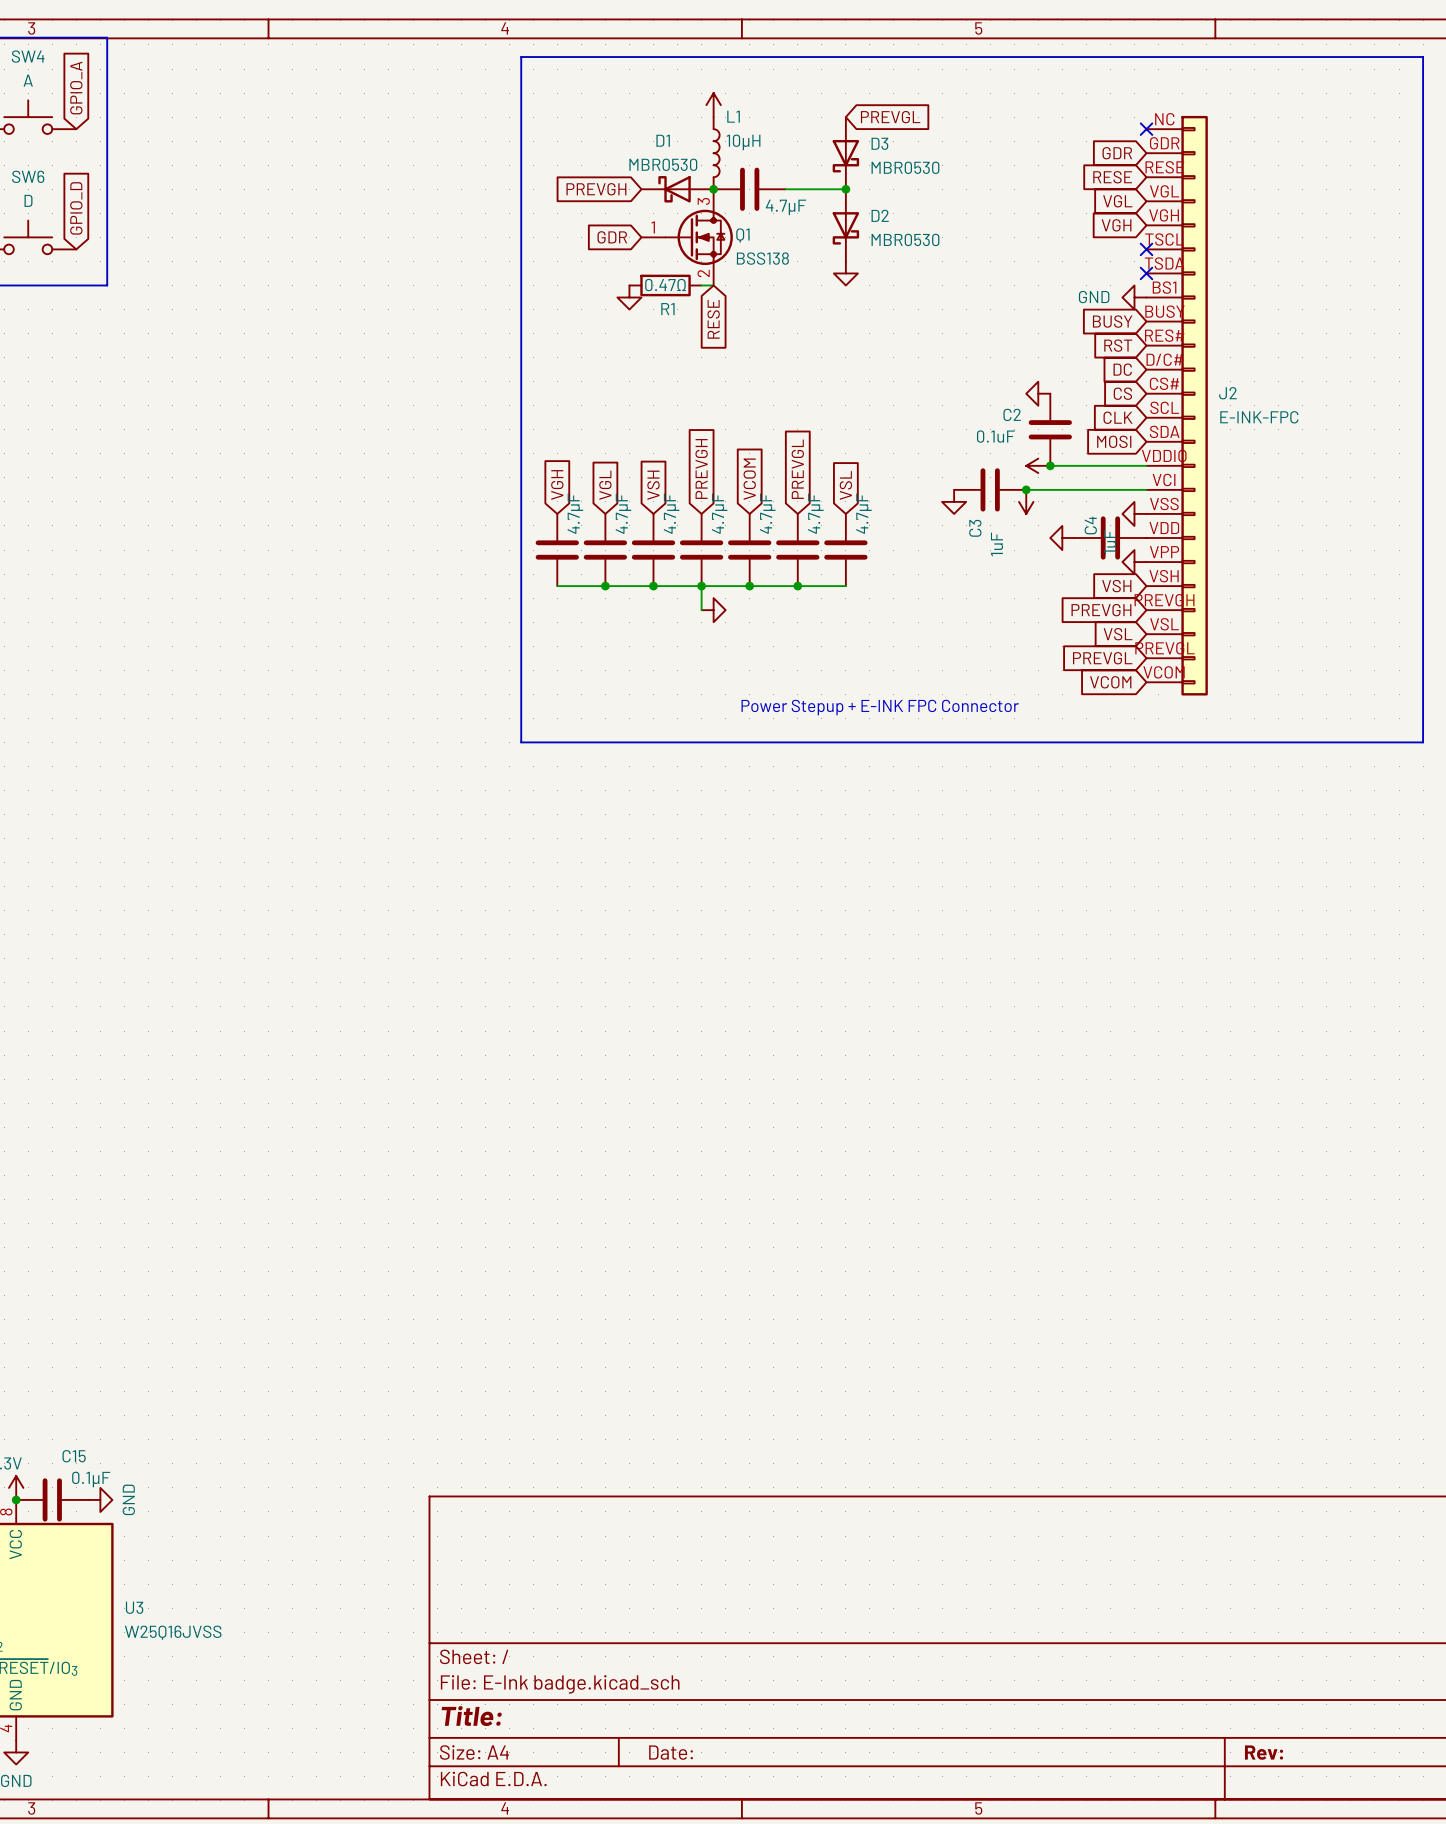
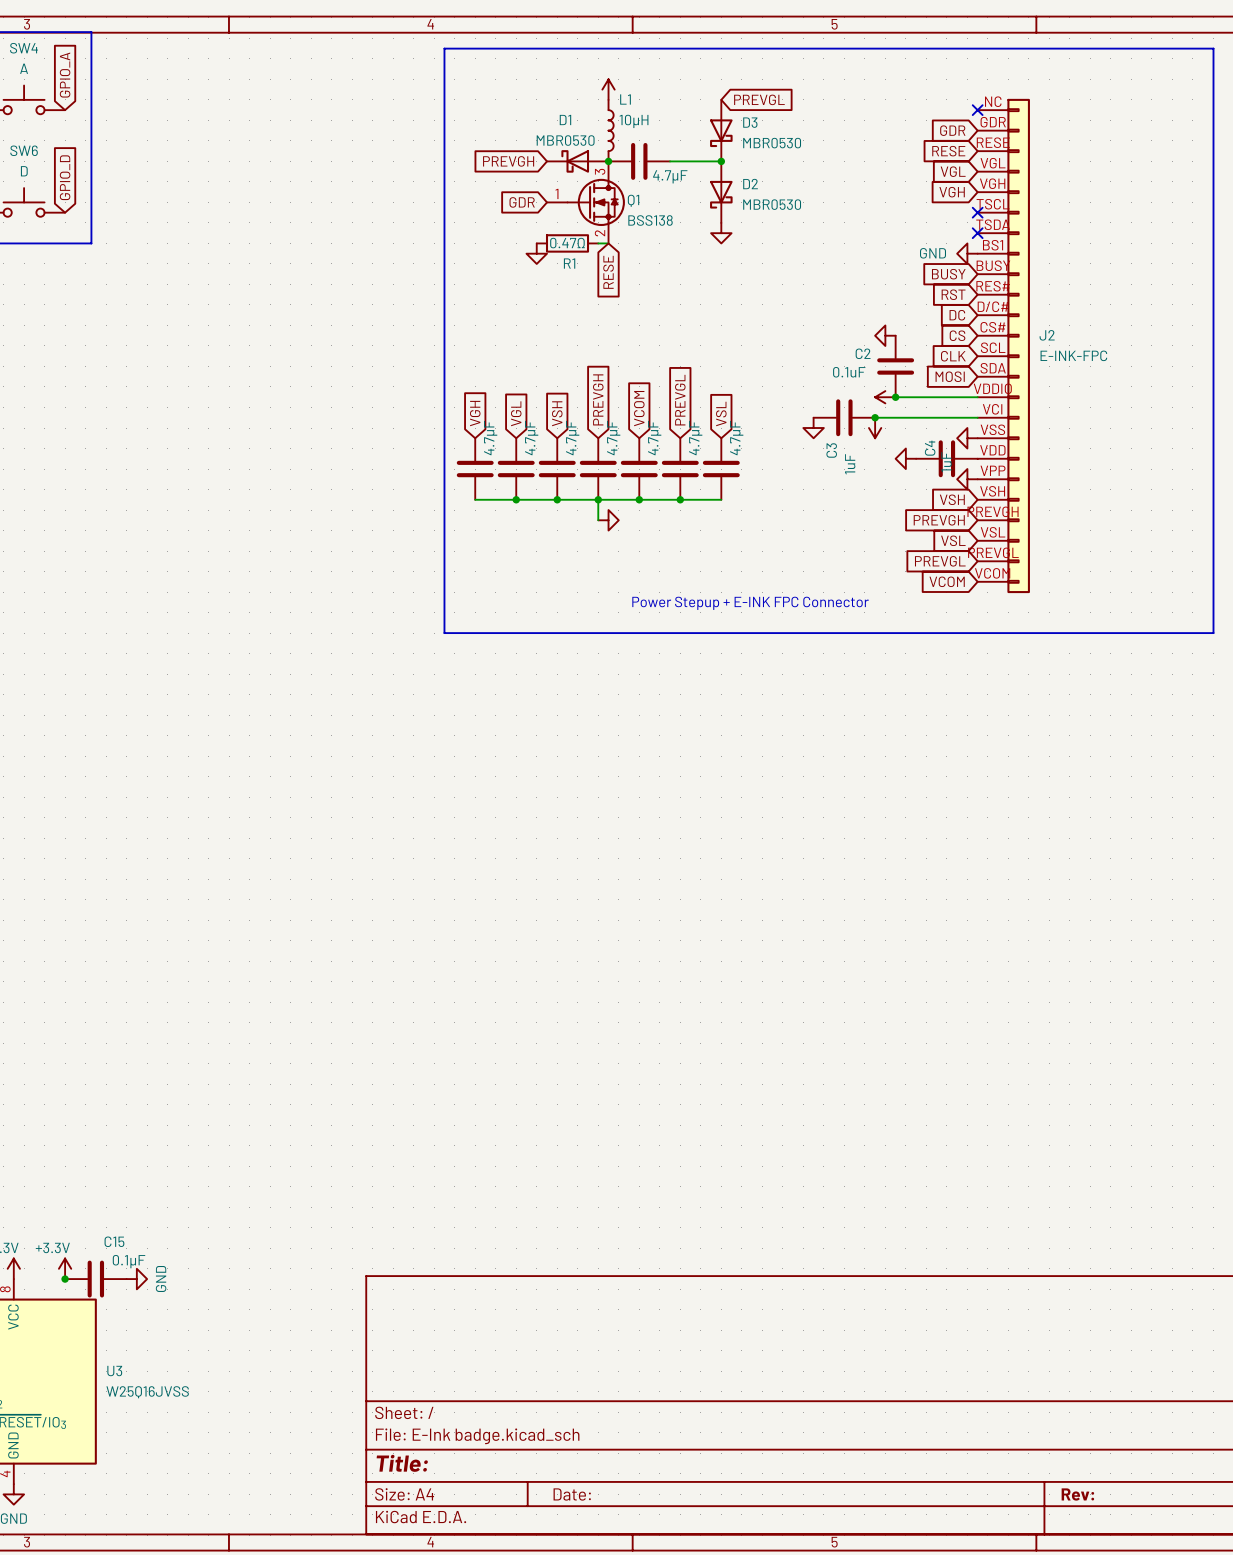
power symbol: none -> +3.3V (65, 1268)
junction: (16, 1499) -> none
C15 position: (52, 1499) -> (95, 1279)
junction: none -> (65, 1279)
power symbol position: GND (100, 1499) -> GND (136, 1279)

